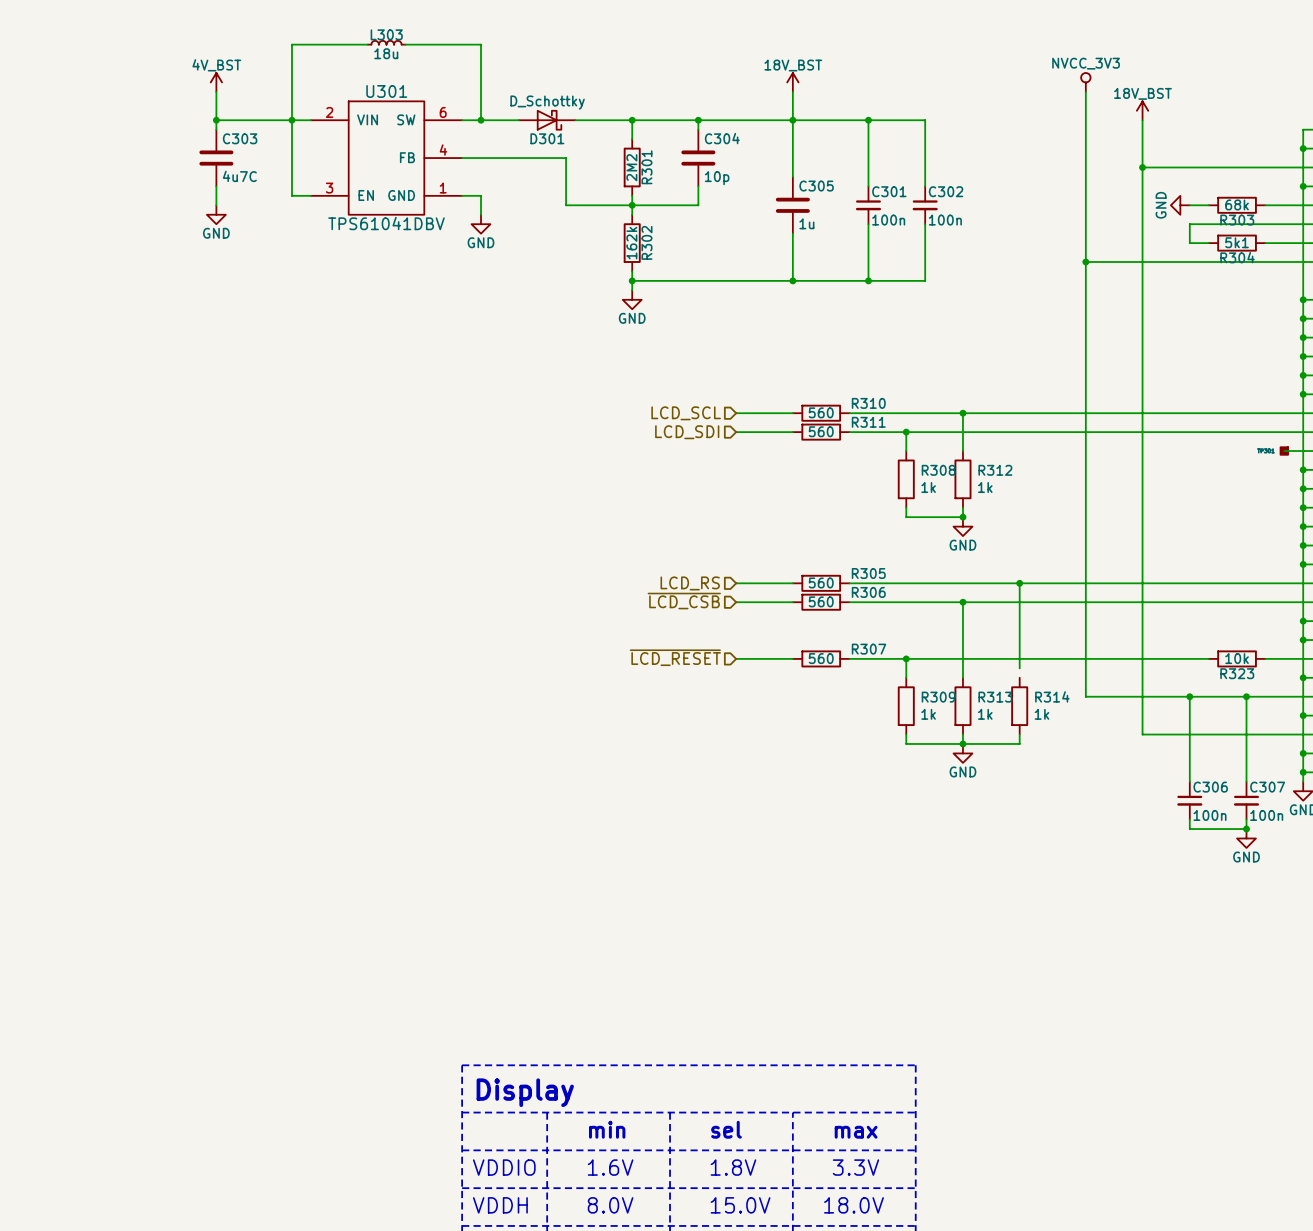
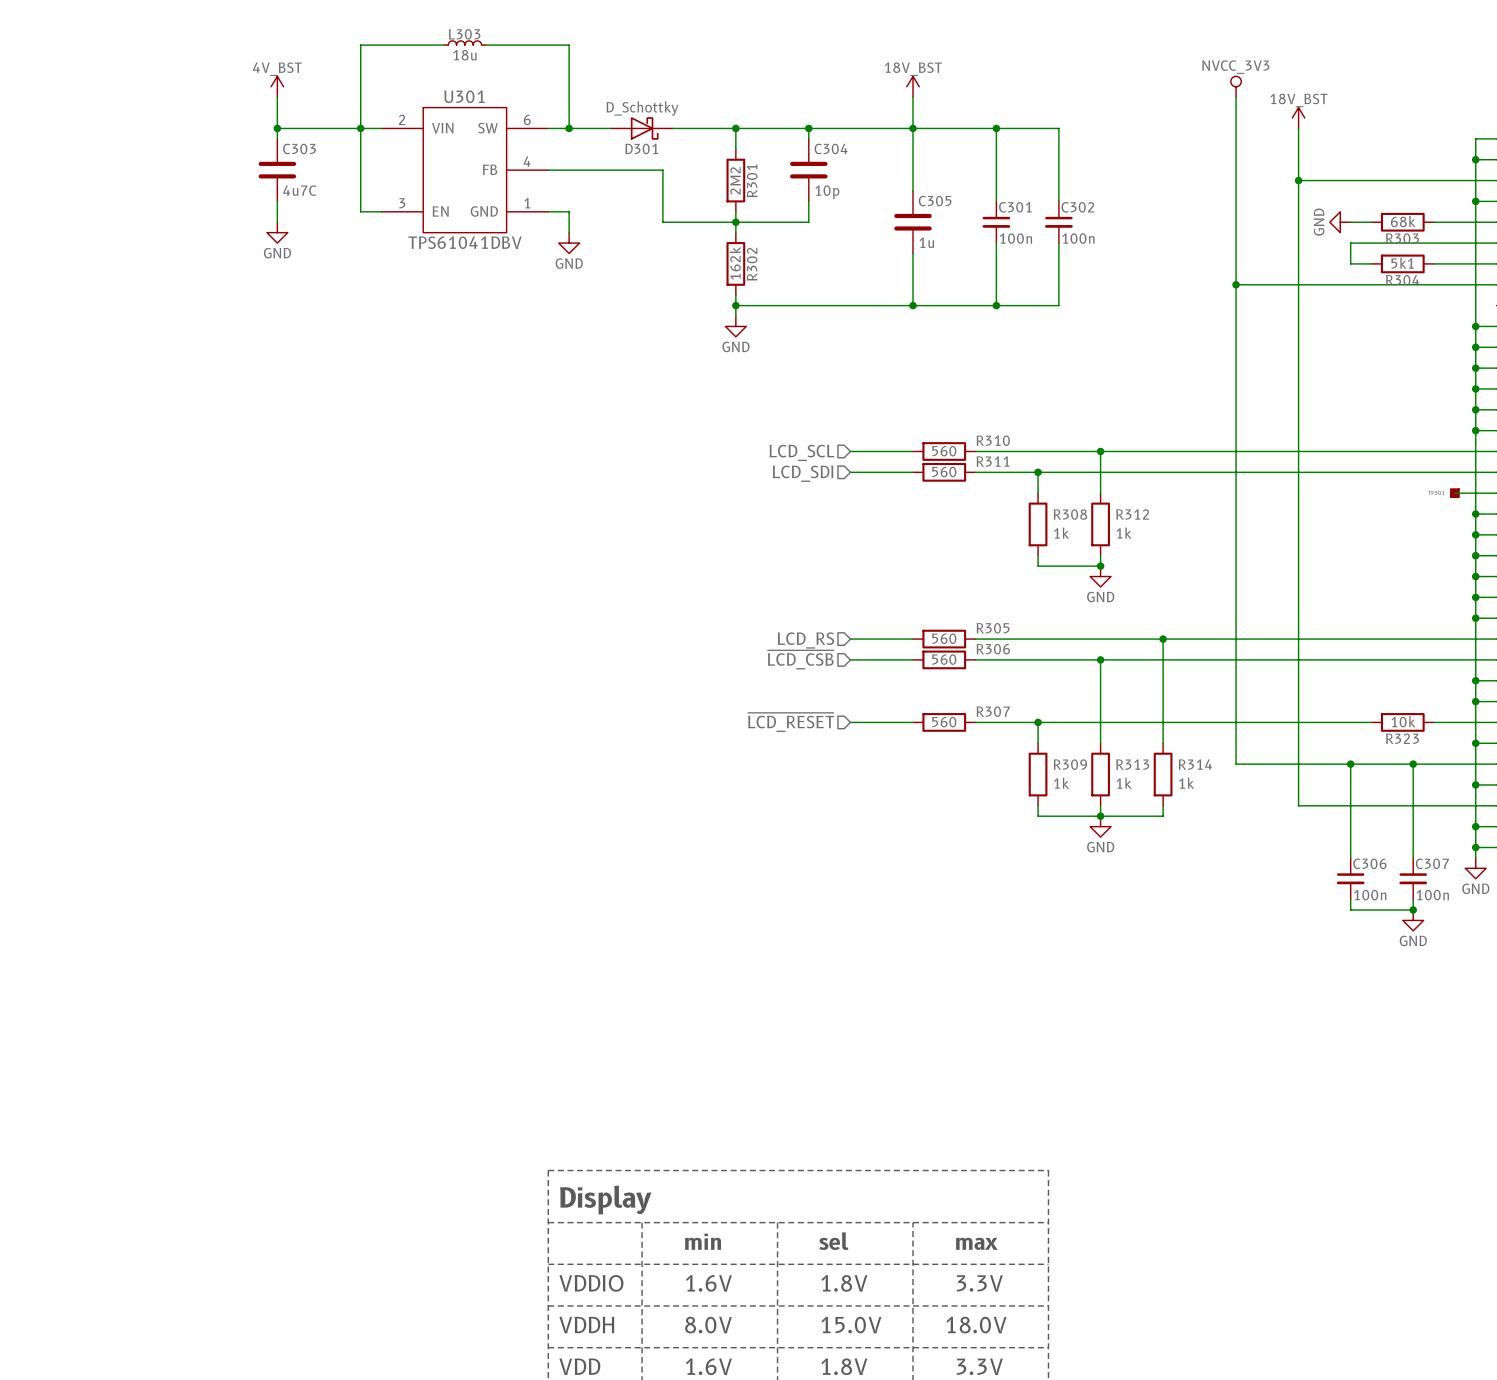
wire: none -> (1163, 732) (1163, 743)

